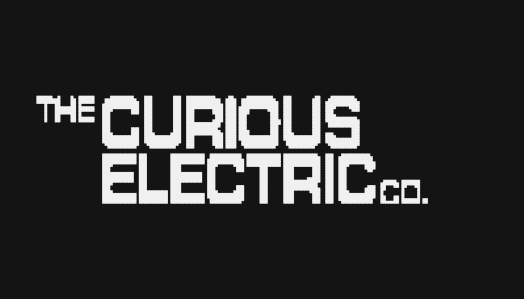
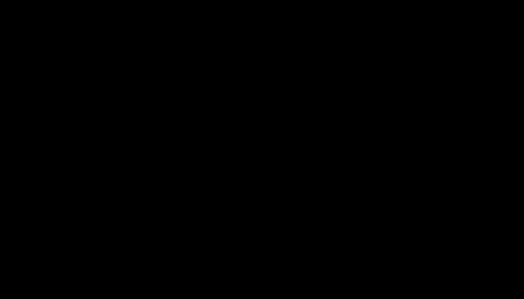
drawing: [36, 95, 428, 204] -> none

